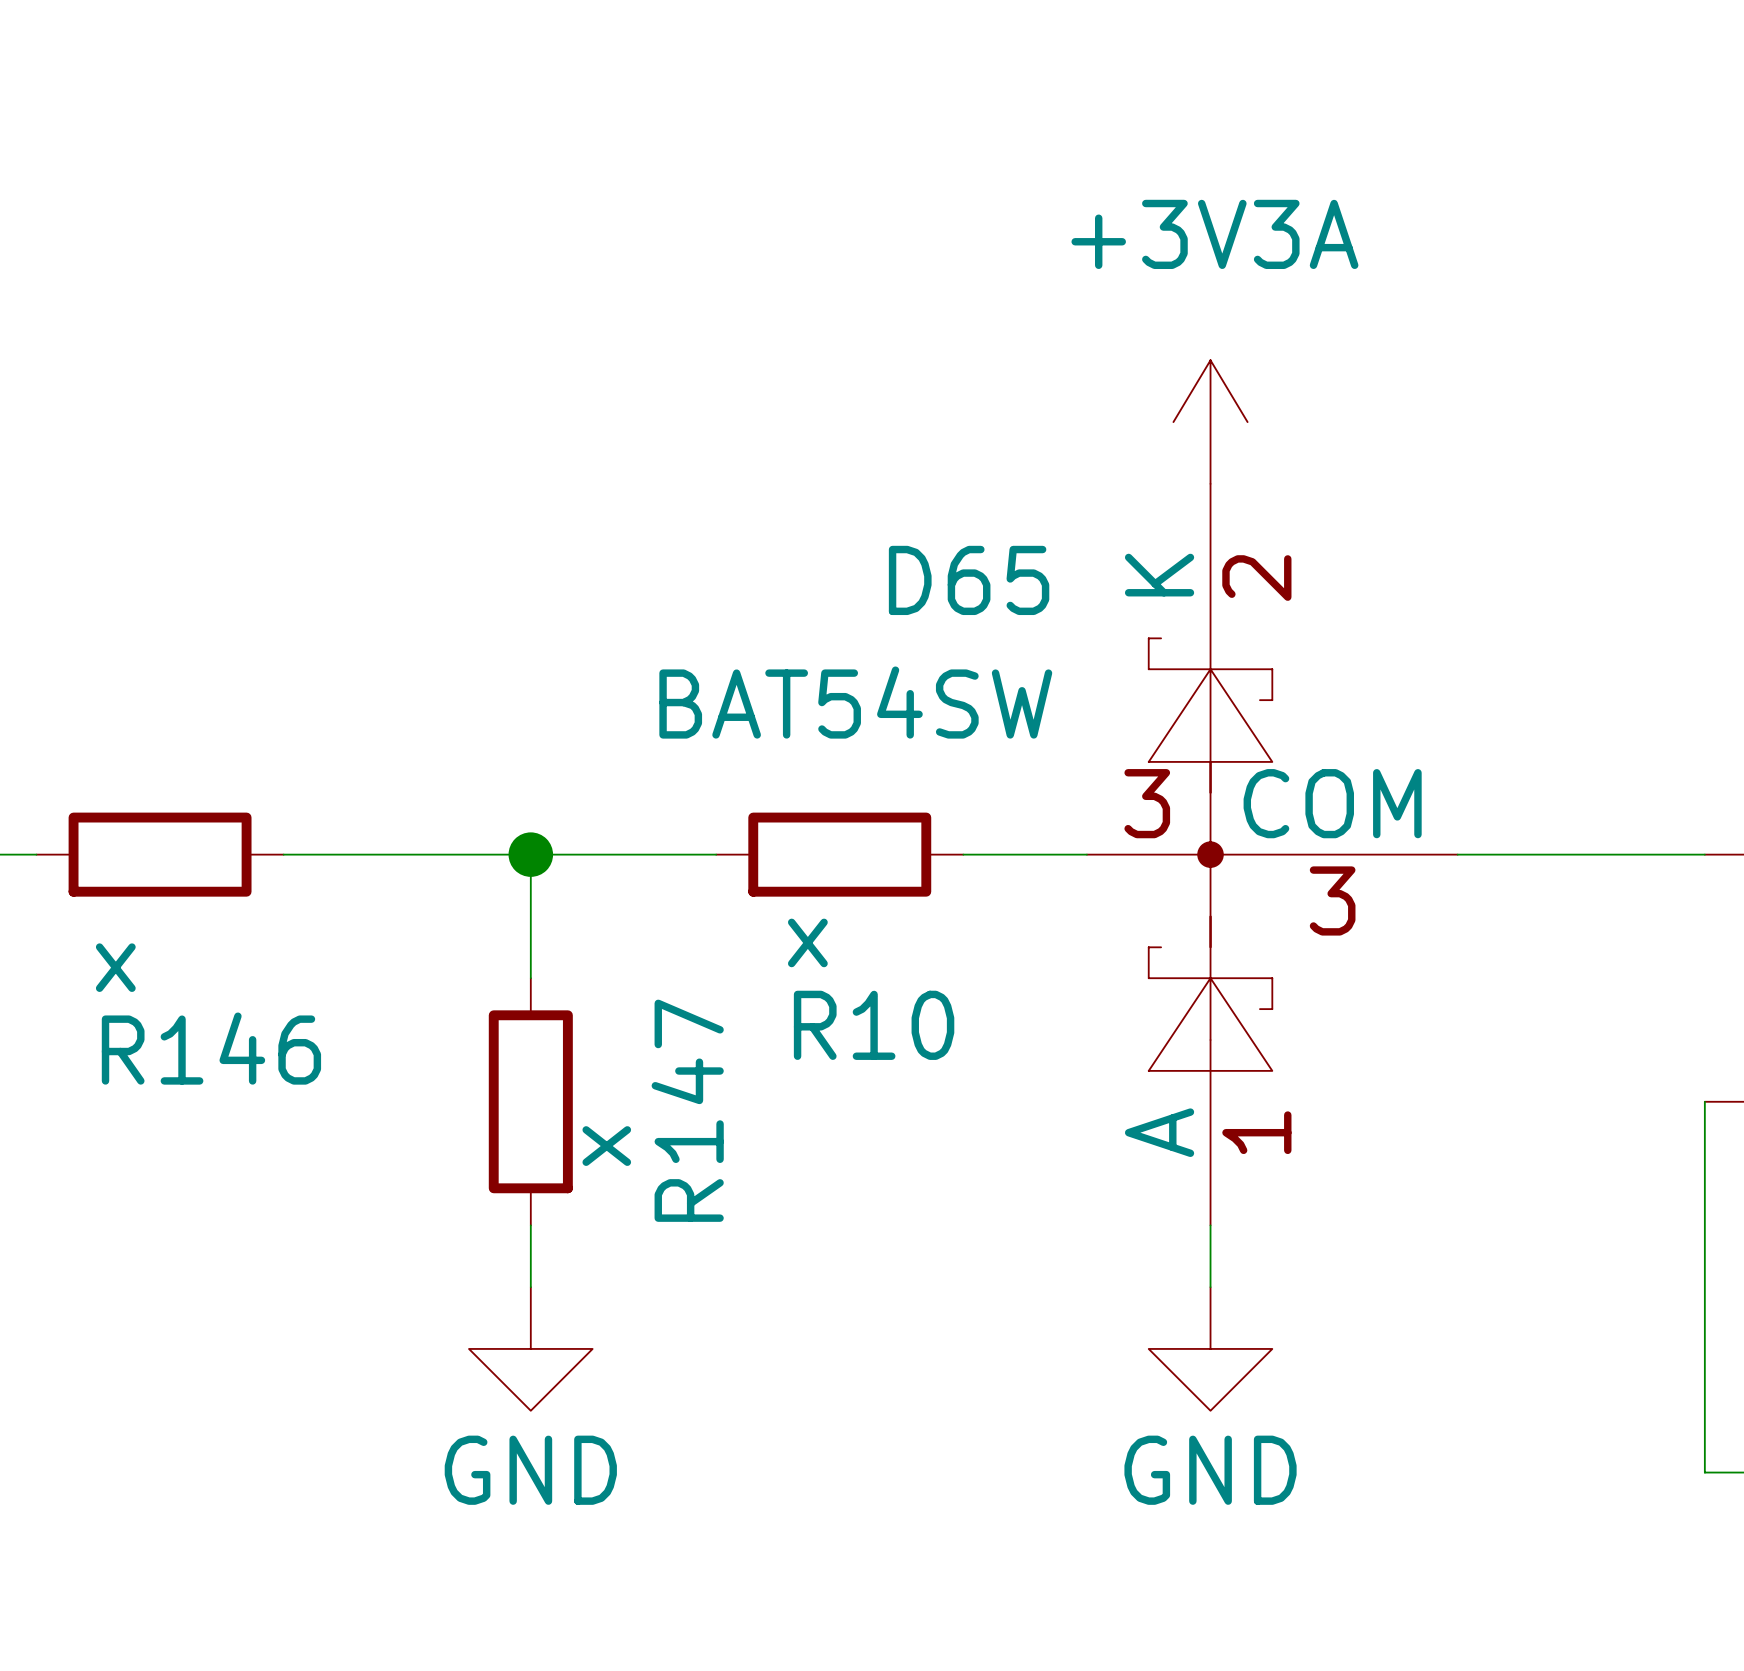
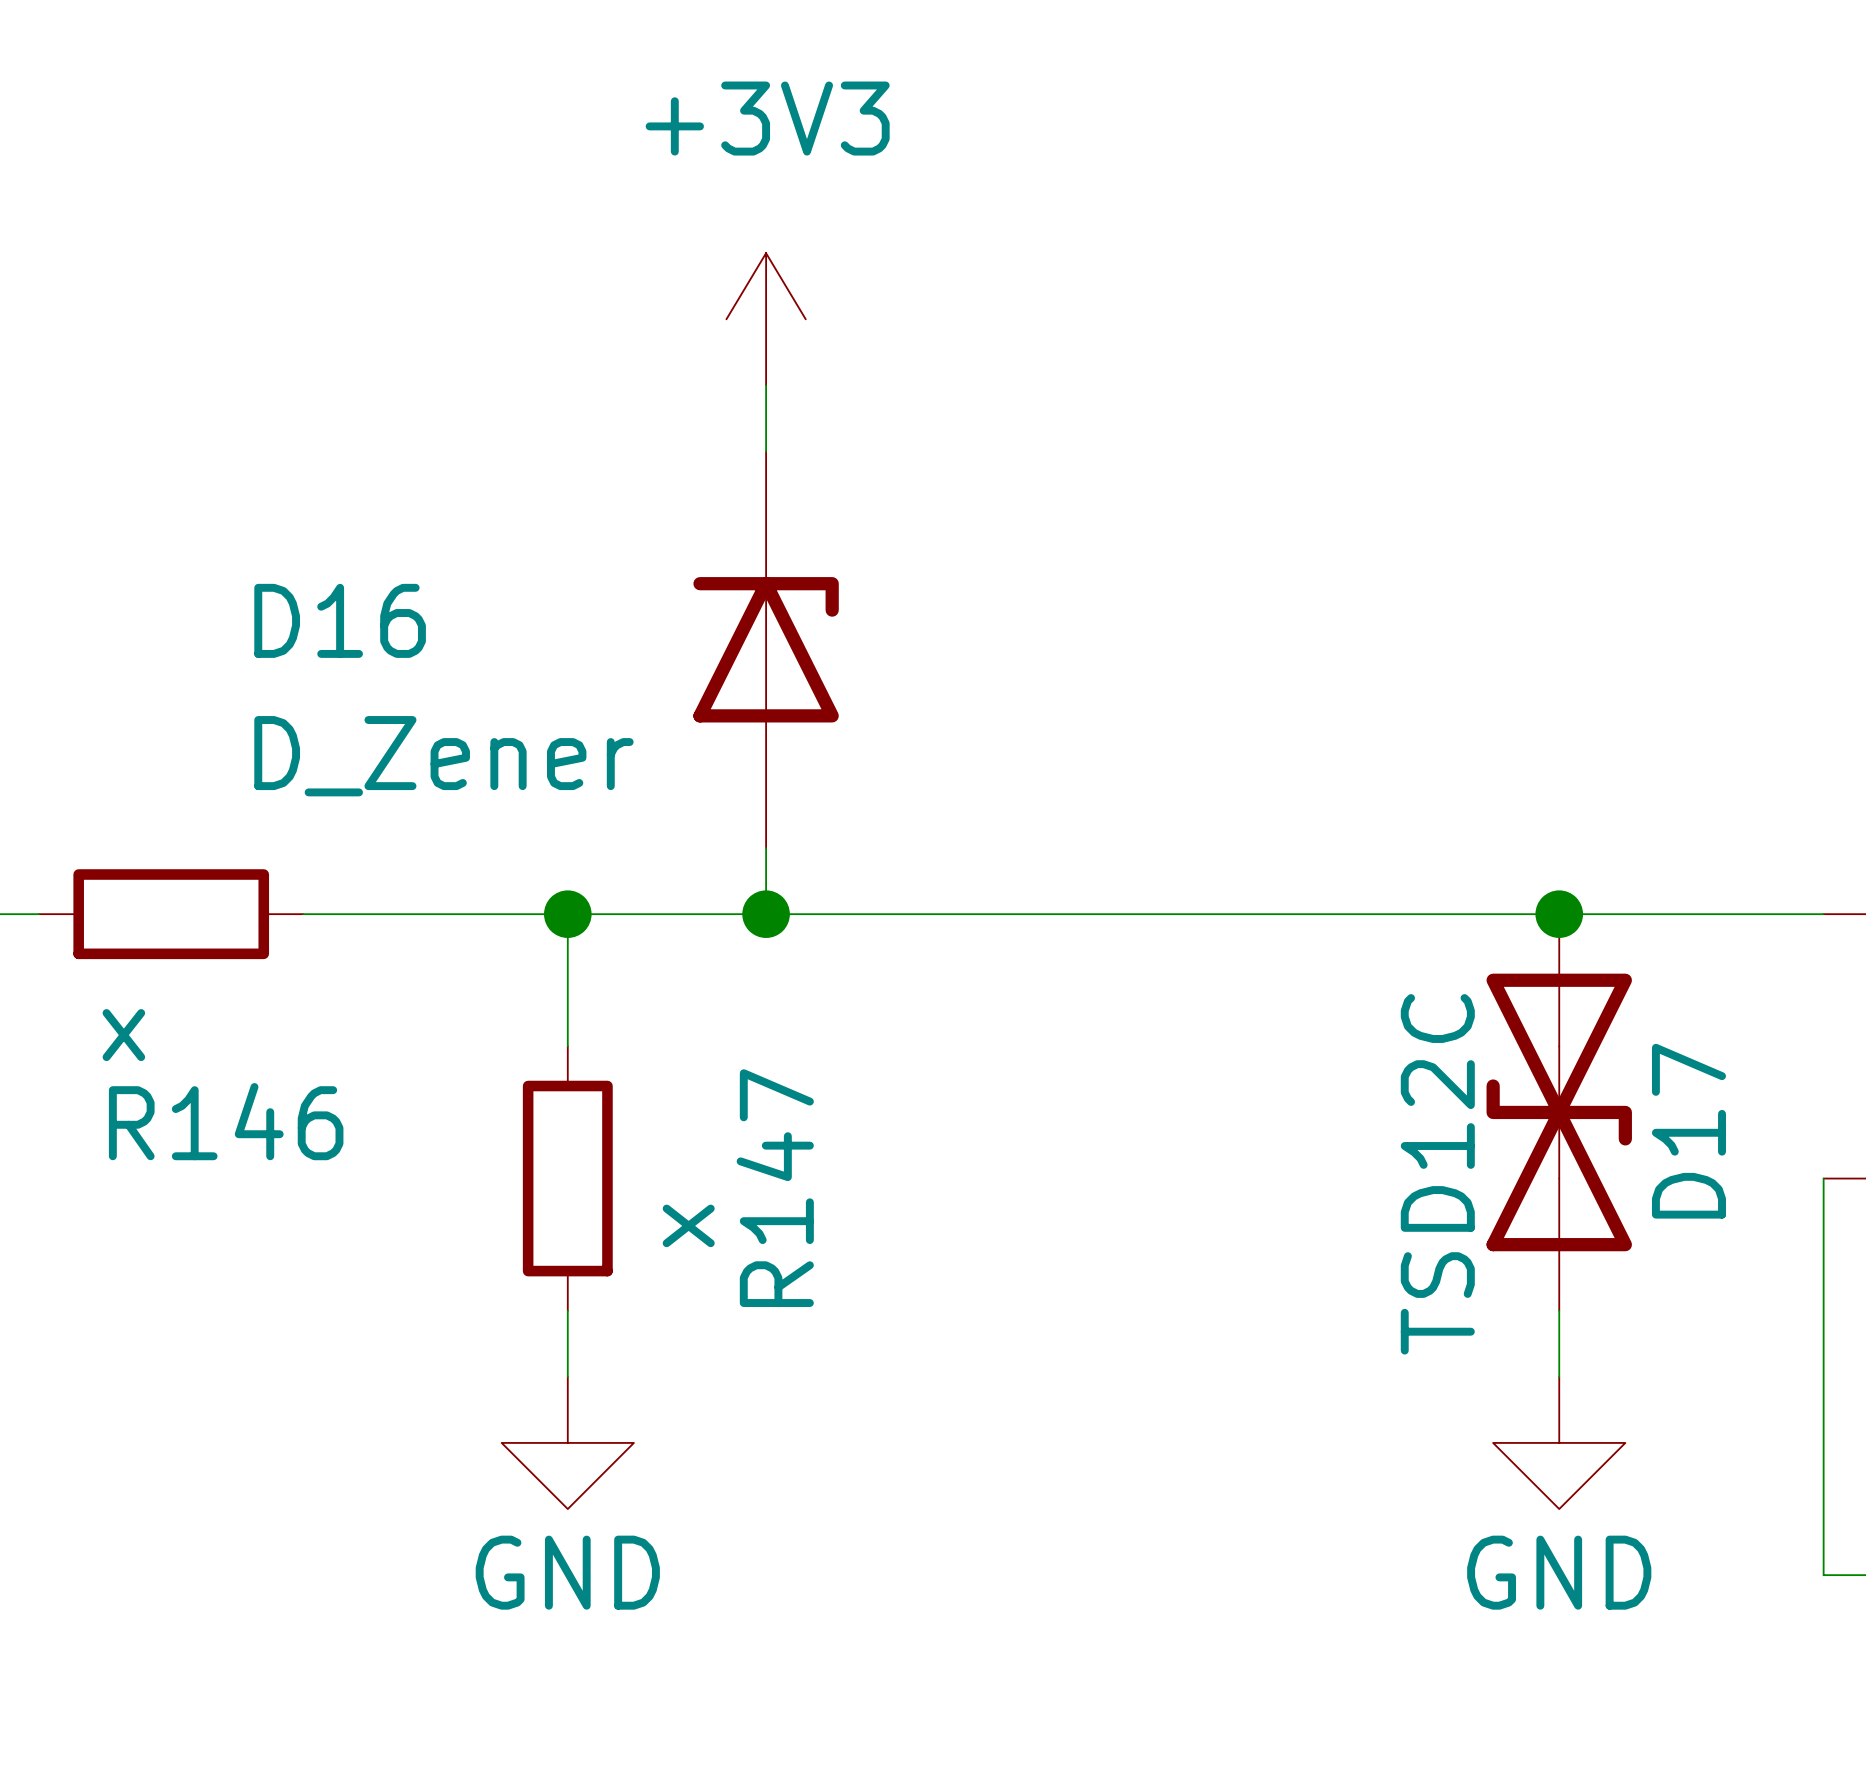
power symbol: none -> +3V3 (766, 319)
wire: none -> (766, 385) (766, 451)
power symbol: +3V3A (1210, 422) -> none
D16: none -> D_Zener (766, 649)
wire: none -> (766, 848) (766, 914) (1030, 914)
junction: none -> (766, 914)
R10: x (839, 854) -> none
D65: BAT54SW (1272, 854) -> none
junction: none -> (1559, 914)
D17: none -> TSD12C (1559, 1112)
R147 name position: R147 (687, 1110) -> R147 (775, 1188)
R147 value position: x (606, 1146) -> x (688, 1225)
wire: (1210, 1225) (1210, 1287) -> (1559, 1310) (1559, 1376)
power symbol position: GND (1210, 1348) -> GND (1559, 1442)

